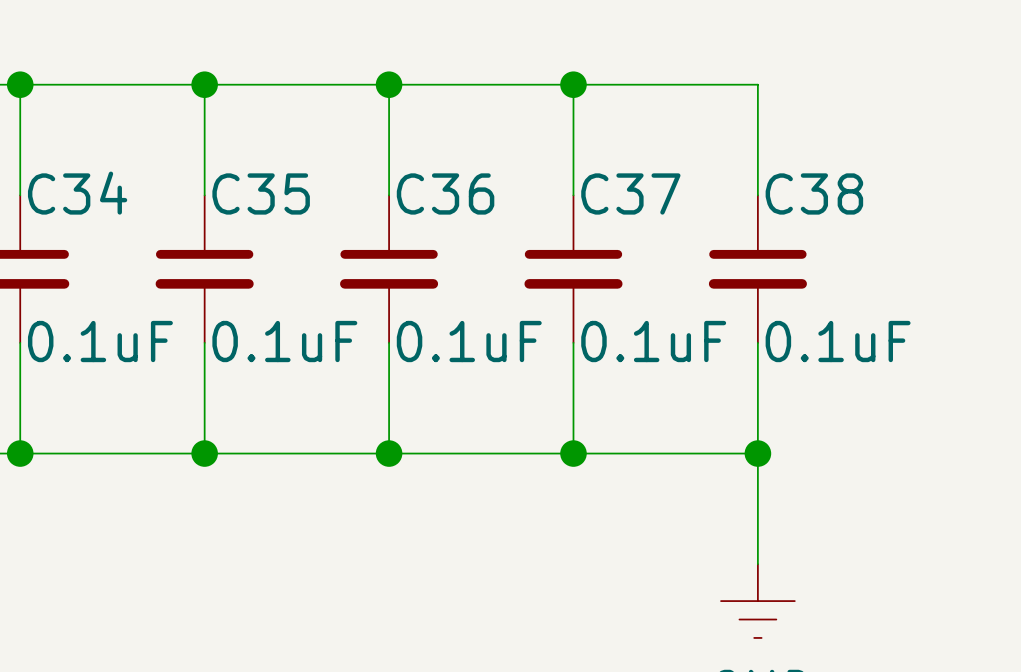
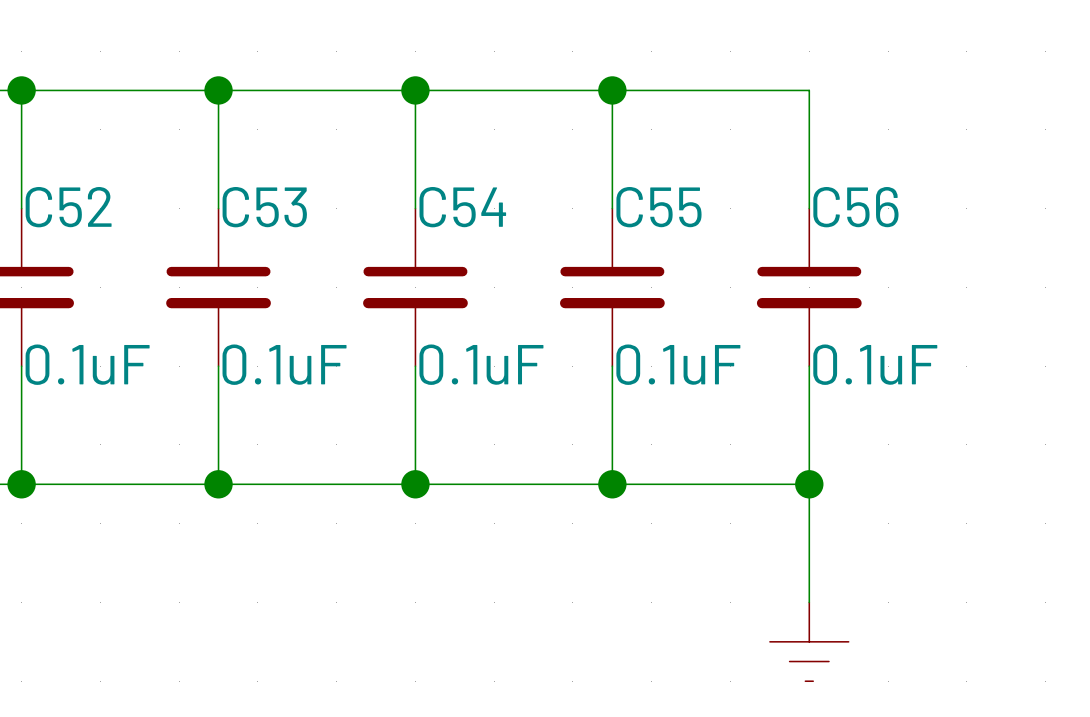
C34 name: C34 (77, 193) -> C52 (68, 207)
C35 name: C35 (261, 193) -> C53 (264, 207)
C36 name: C36 (445, 193) -> C54 (462, 207)
C37 name: C37 (630, 193) -> C55 (658, 207)
C38 name: C38 (814, 193) -> C56 (855, 207)

